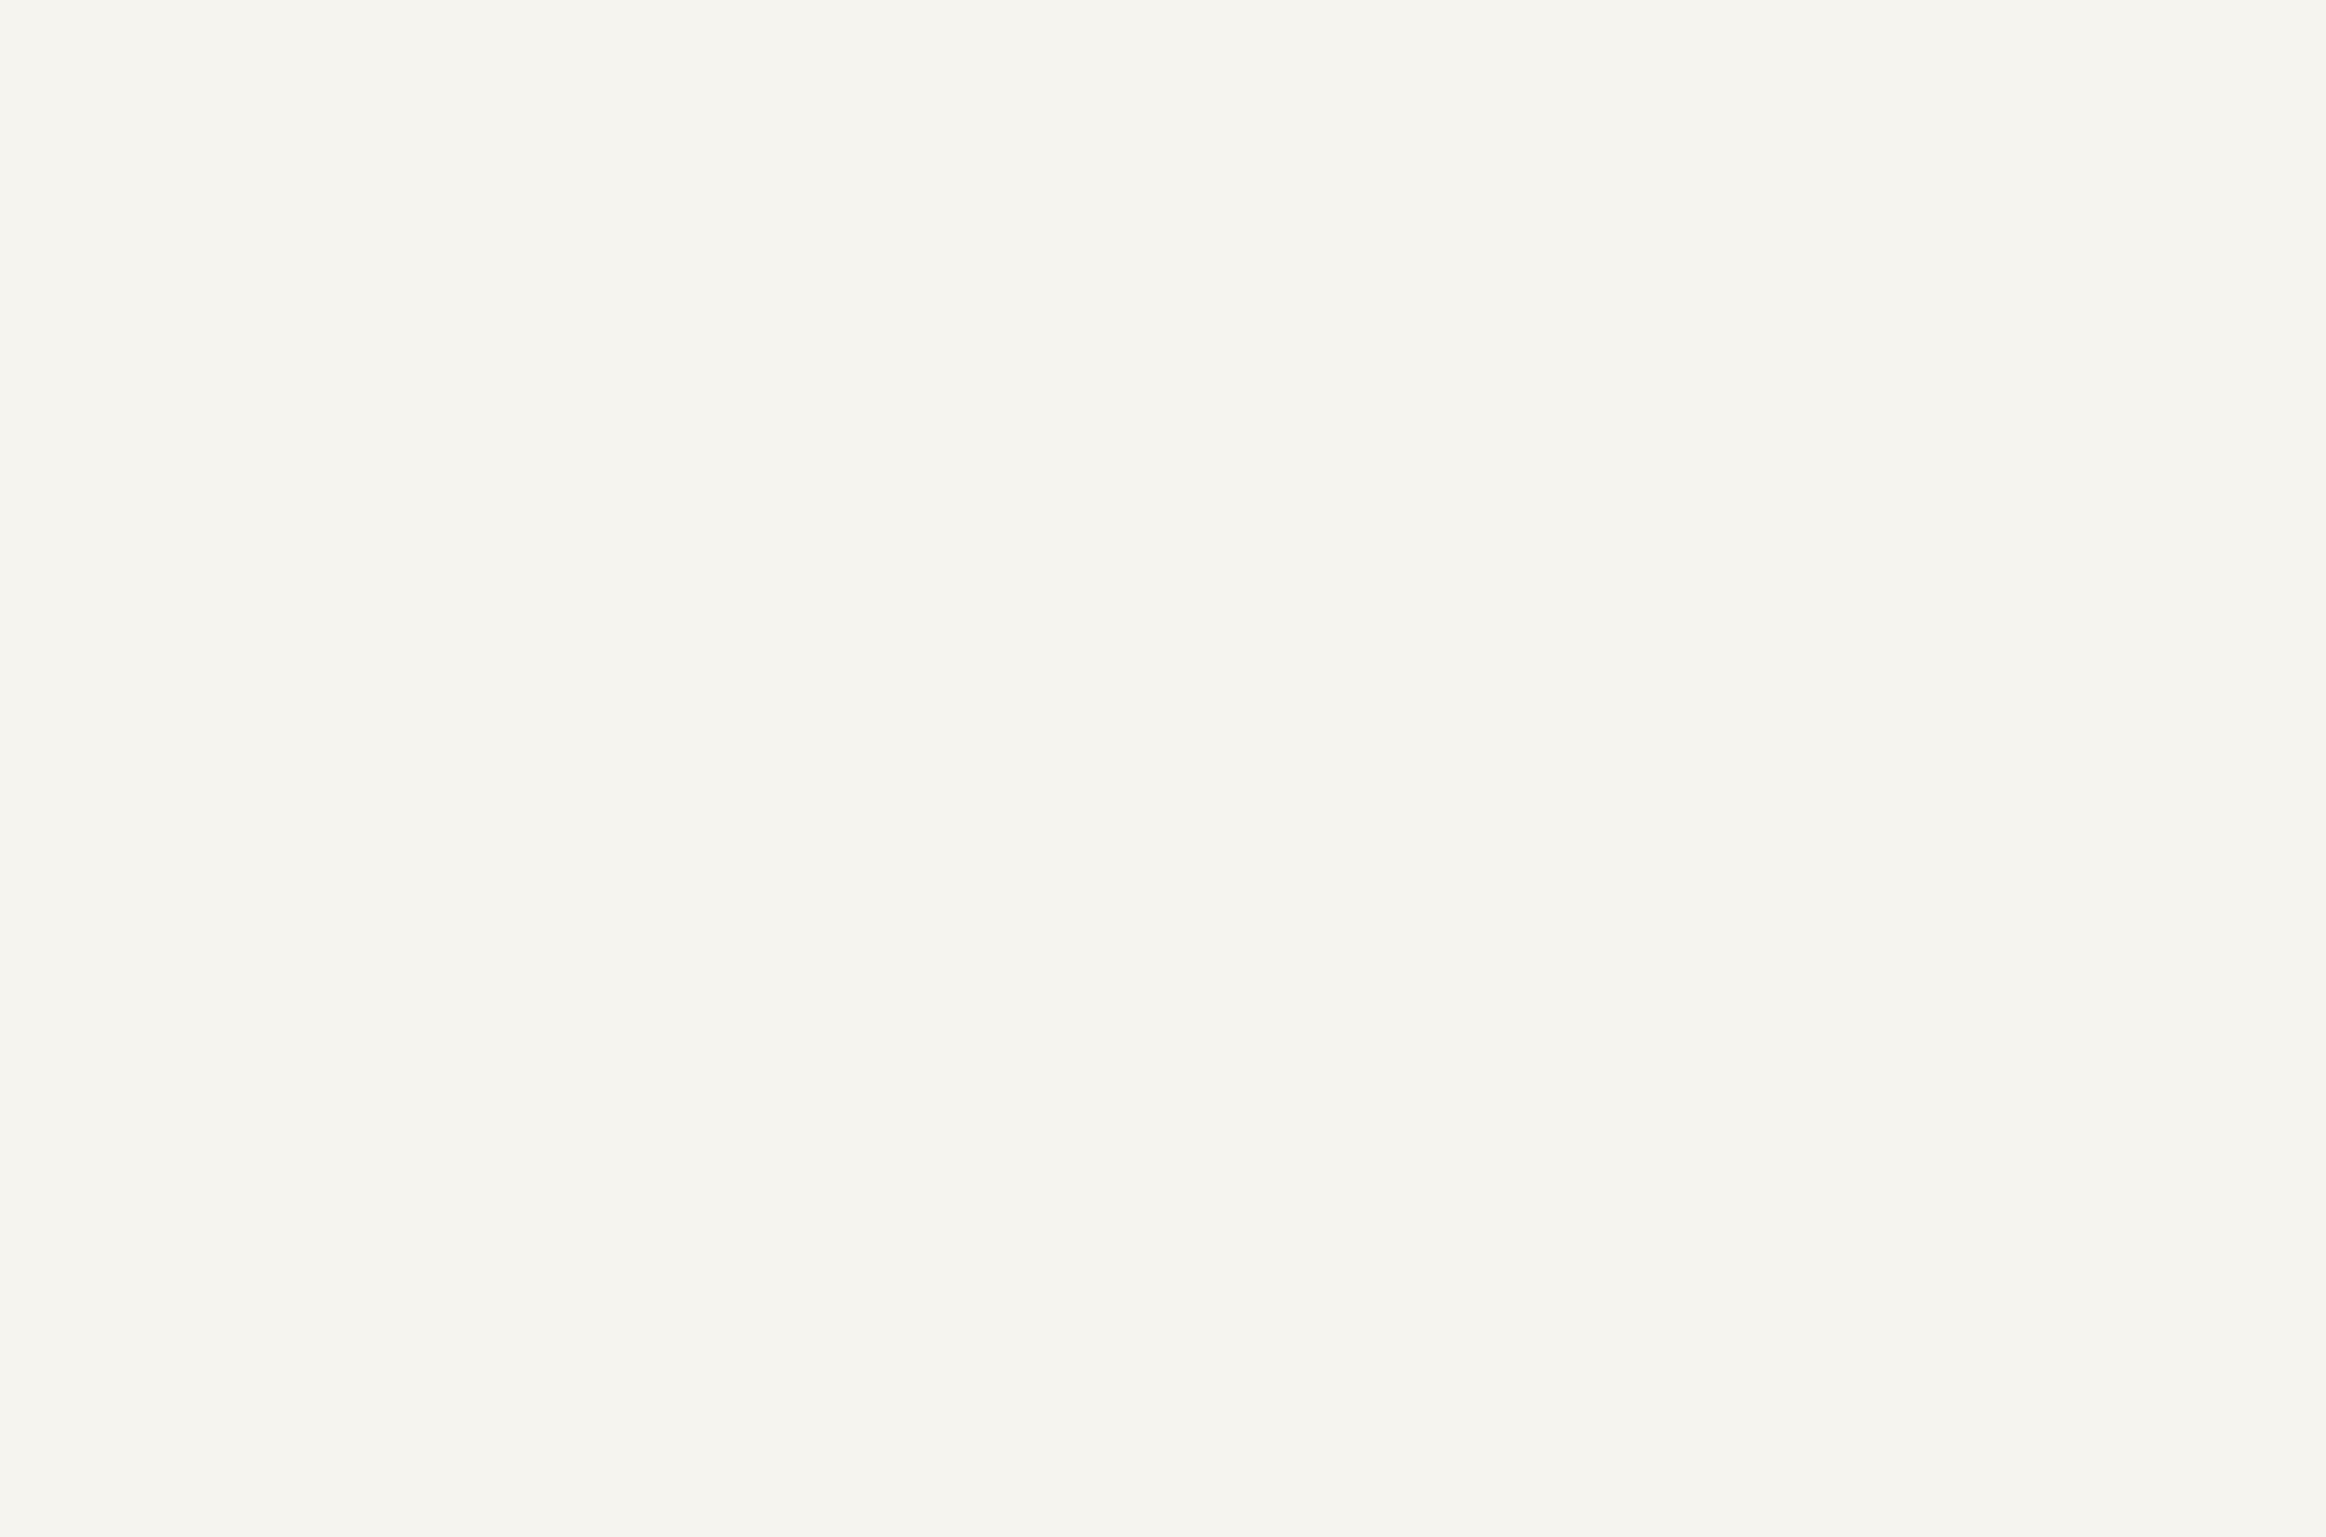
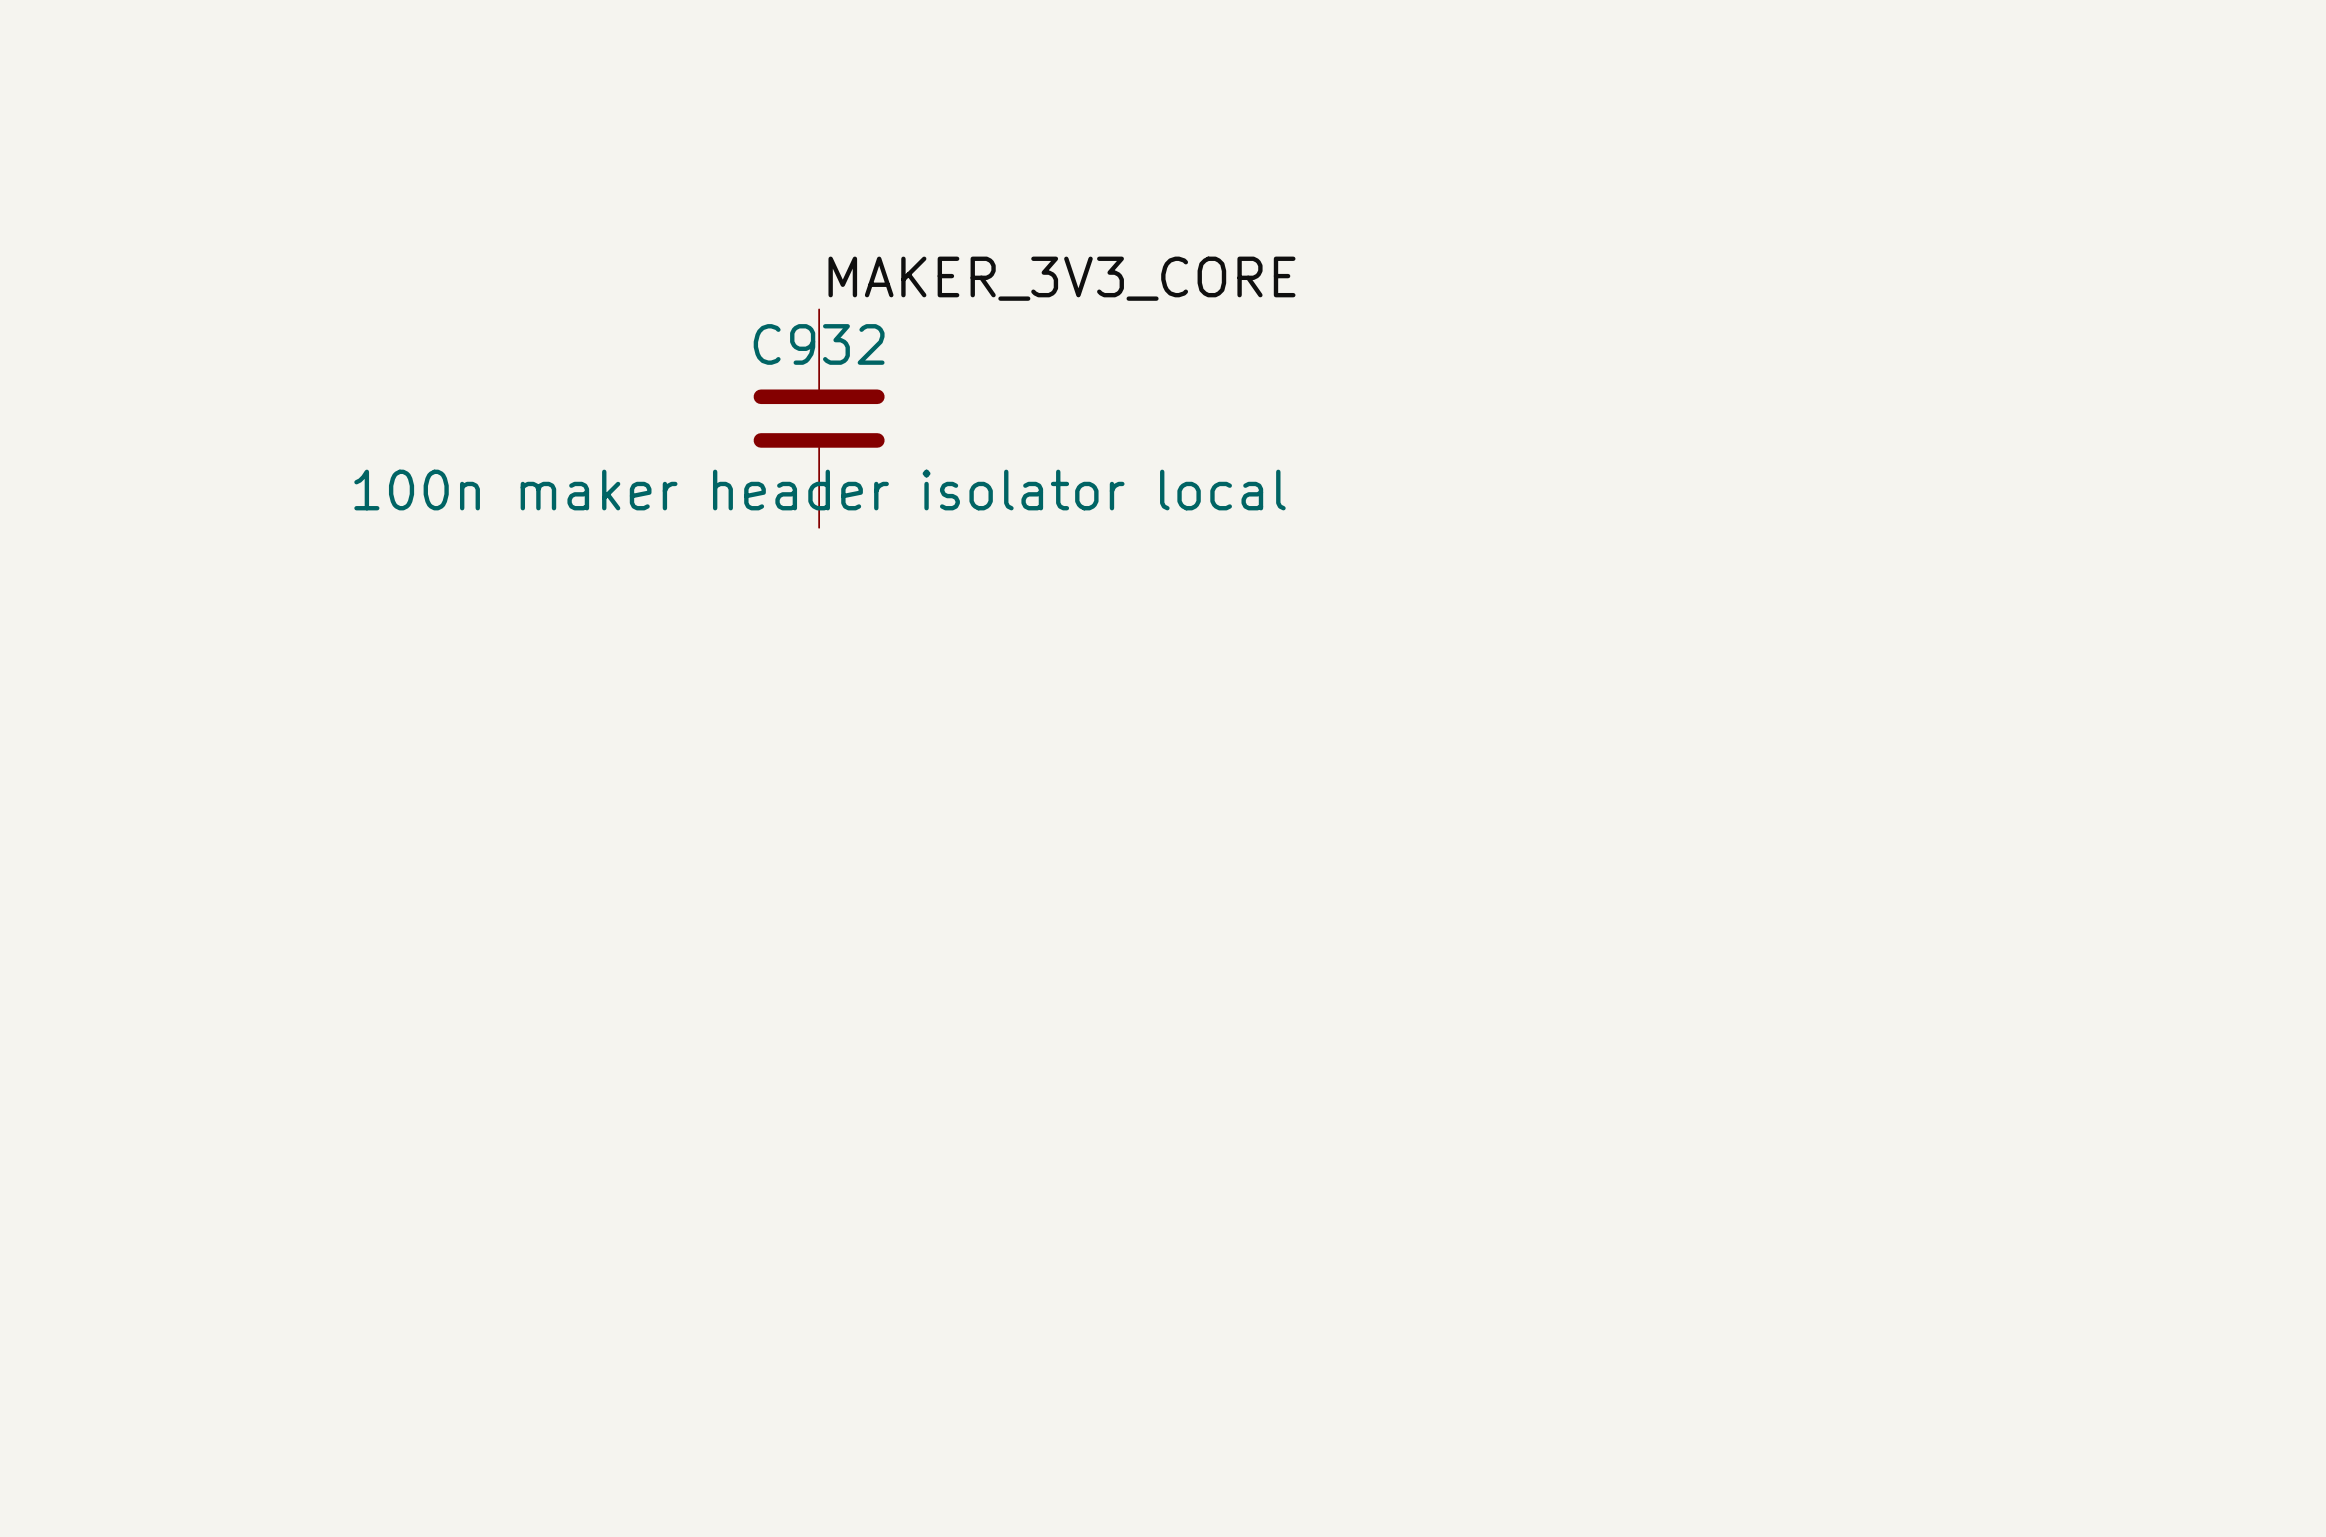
label: none -> MAKER_3V3_CORE (1061, 278)
C932: none -> 100n maker header isolator local (819, 418)

